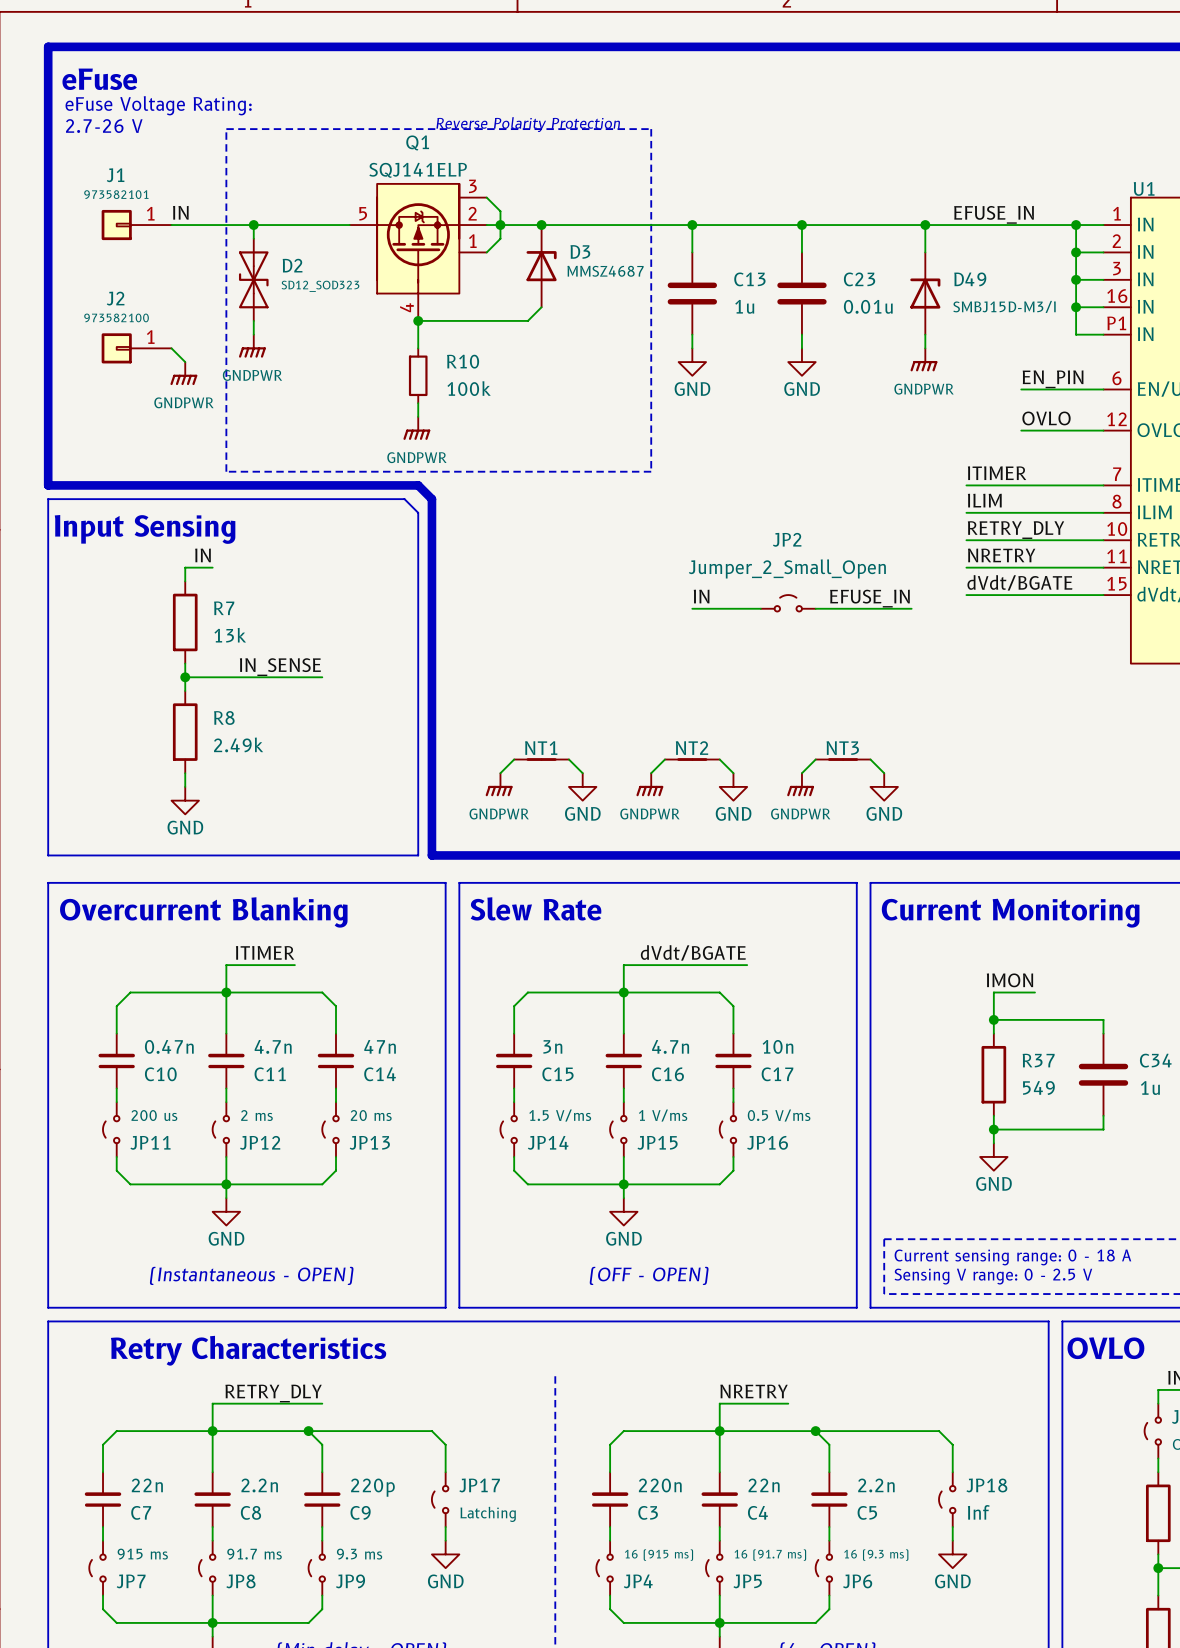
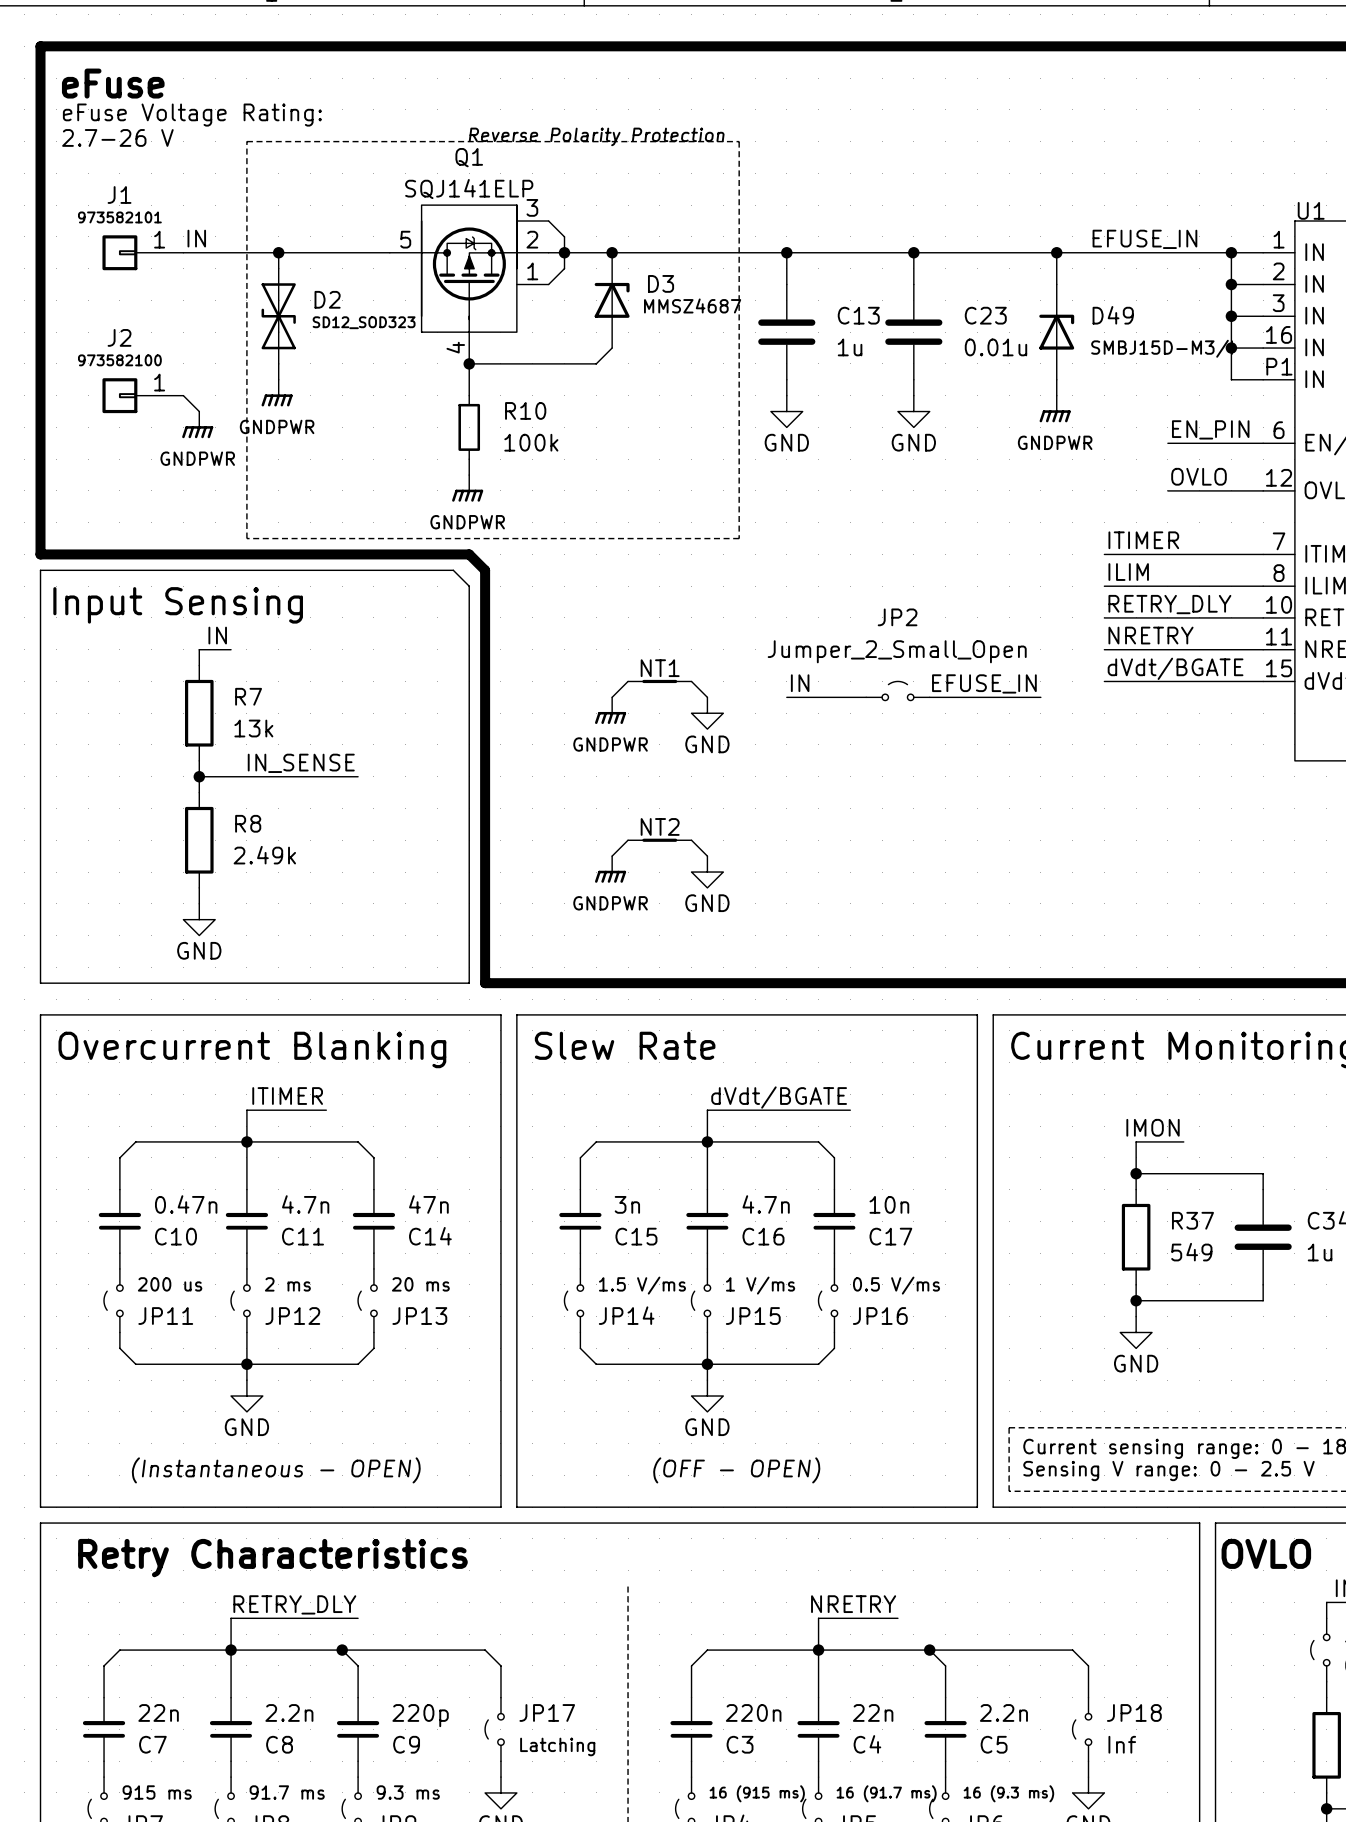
power symbol: none -> GNDPWR (610, 710)
power symbol: none -> GND (707, 713)
wire: (514, 759) (500, 773) -> (628, 840) (612, 856)
NT1 position: (541, 759) -> (659, 681)
wire: (568, 759) (582, 773) -> (691, 840) (707, 856)
wire: (664, 759) (651, 773) -> (628, 681) (612, 697)
NT2 position: (692, 759) -> (659, 840)
wire: (719, 759) (733, 773) -> (691, 681) (707, 697)
wire: (815, 759) (801, 773) -> none
NT3: (843, 759) -> none
wire: (870, 759) (884, 773) -> none
power symbol position: GNDPWR (499, 784) -> GNDPWR (610, 869)
power symbol: GNDPWR (649, 784) -> none
power symbol: GNDPWR (800, 784) -> none
power symbol position: GND (582, 786) -> GND (707, 872)
power symbol: GND (733, 786) -> none
power symbol: GND (884, 786) -> none

